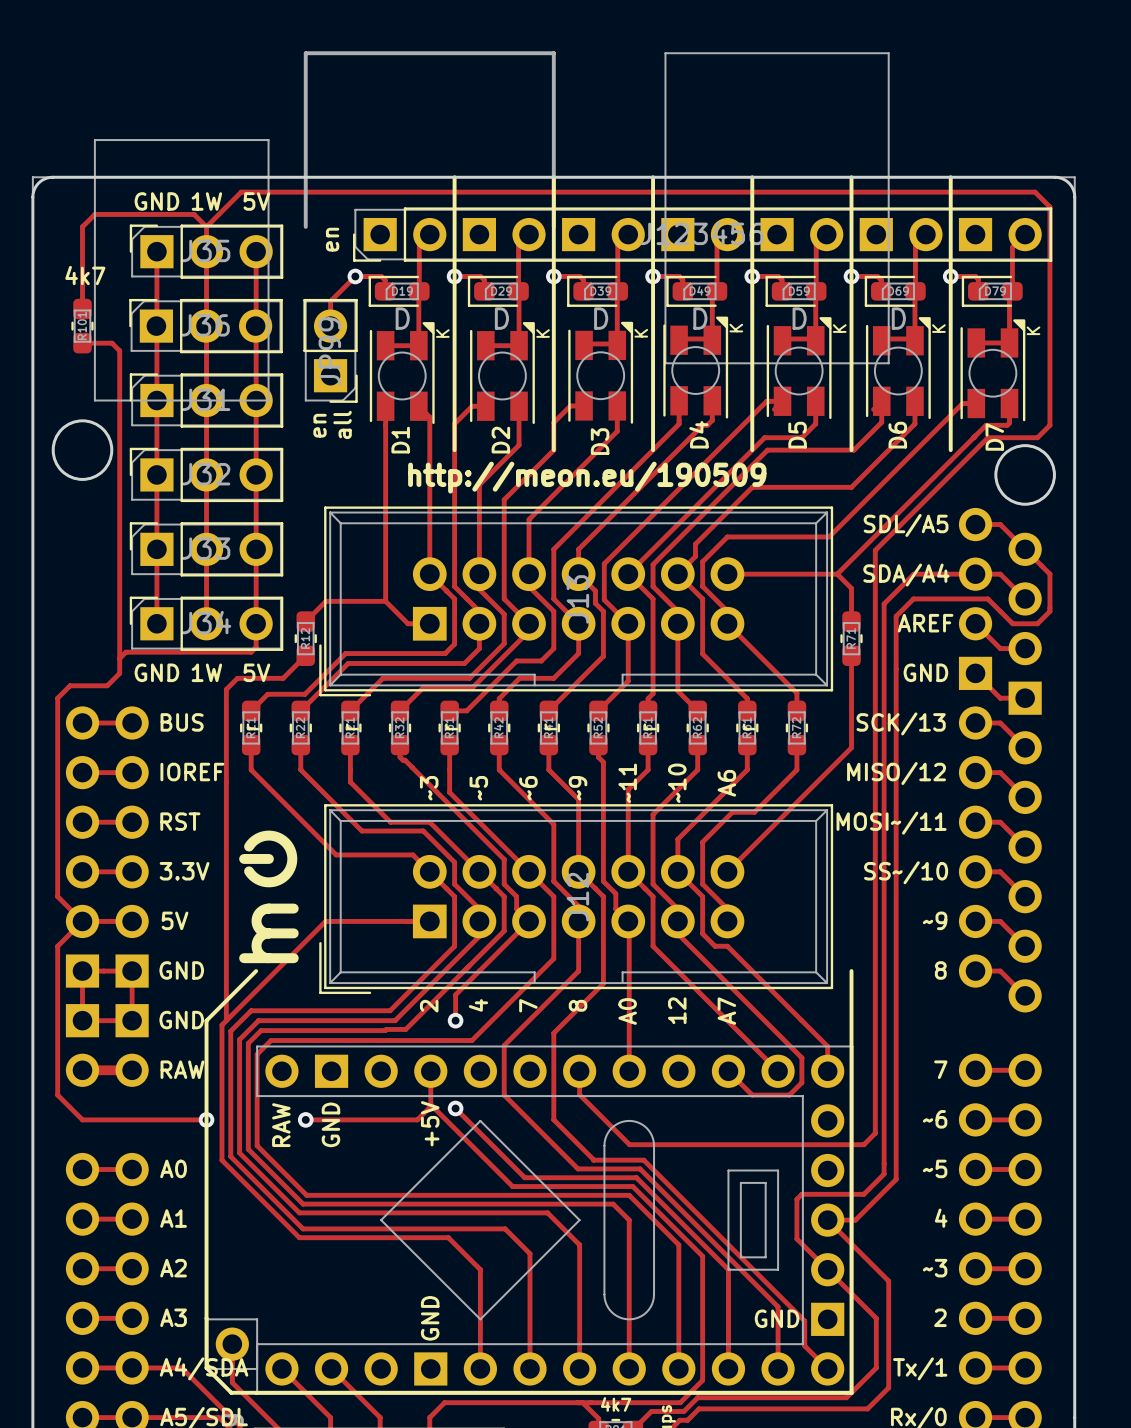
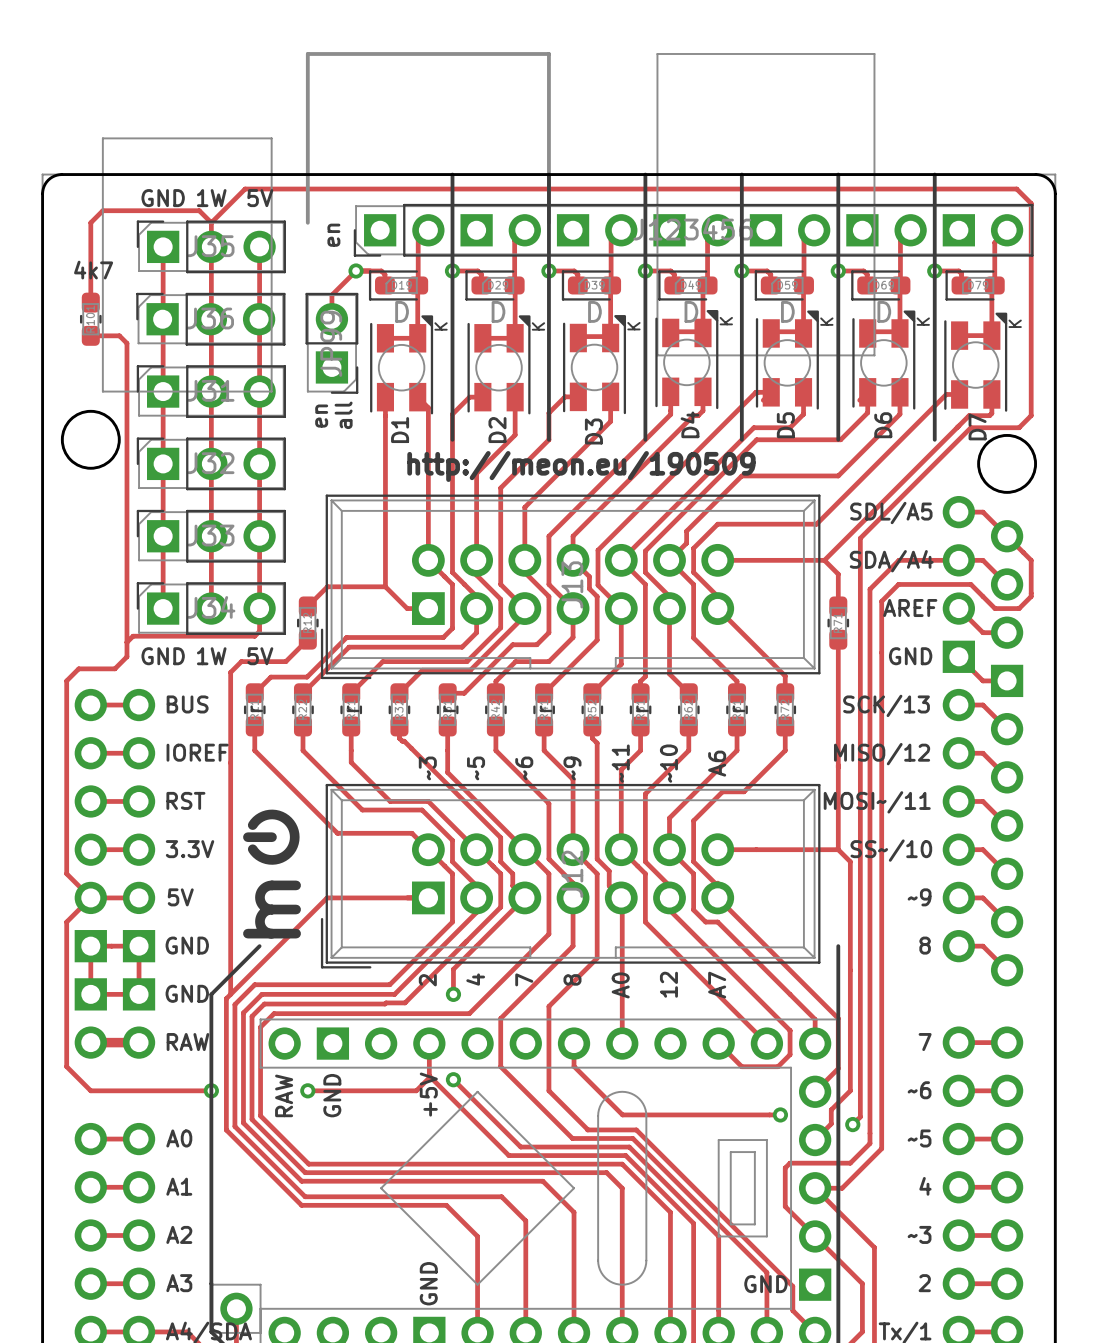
track: (875, 550) (875, 1133) (863, 1144) (791, 1144) -> (861, 537) (860, 1116) (852, 1124)
track: (851, 747) (727, 871) -> (838, 849) (717, 849)
track: none -> (838, 729) (838, 849)
track: none -> (838, 849) (850, 861) (850, 1090) (831, 1109) (831, 1123) (815, 1140)
track: none -> (717, 897) (838, 1018) (838, 1068) (815, 1091)
via: none -> (780, 1114)
via: none -> (852, 1124)

